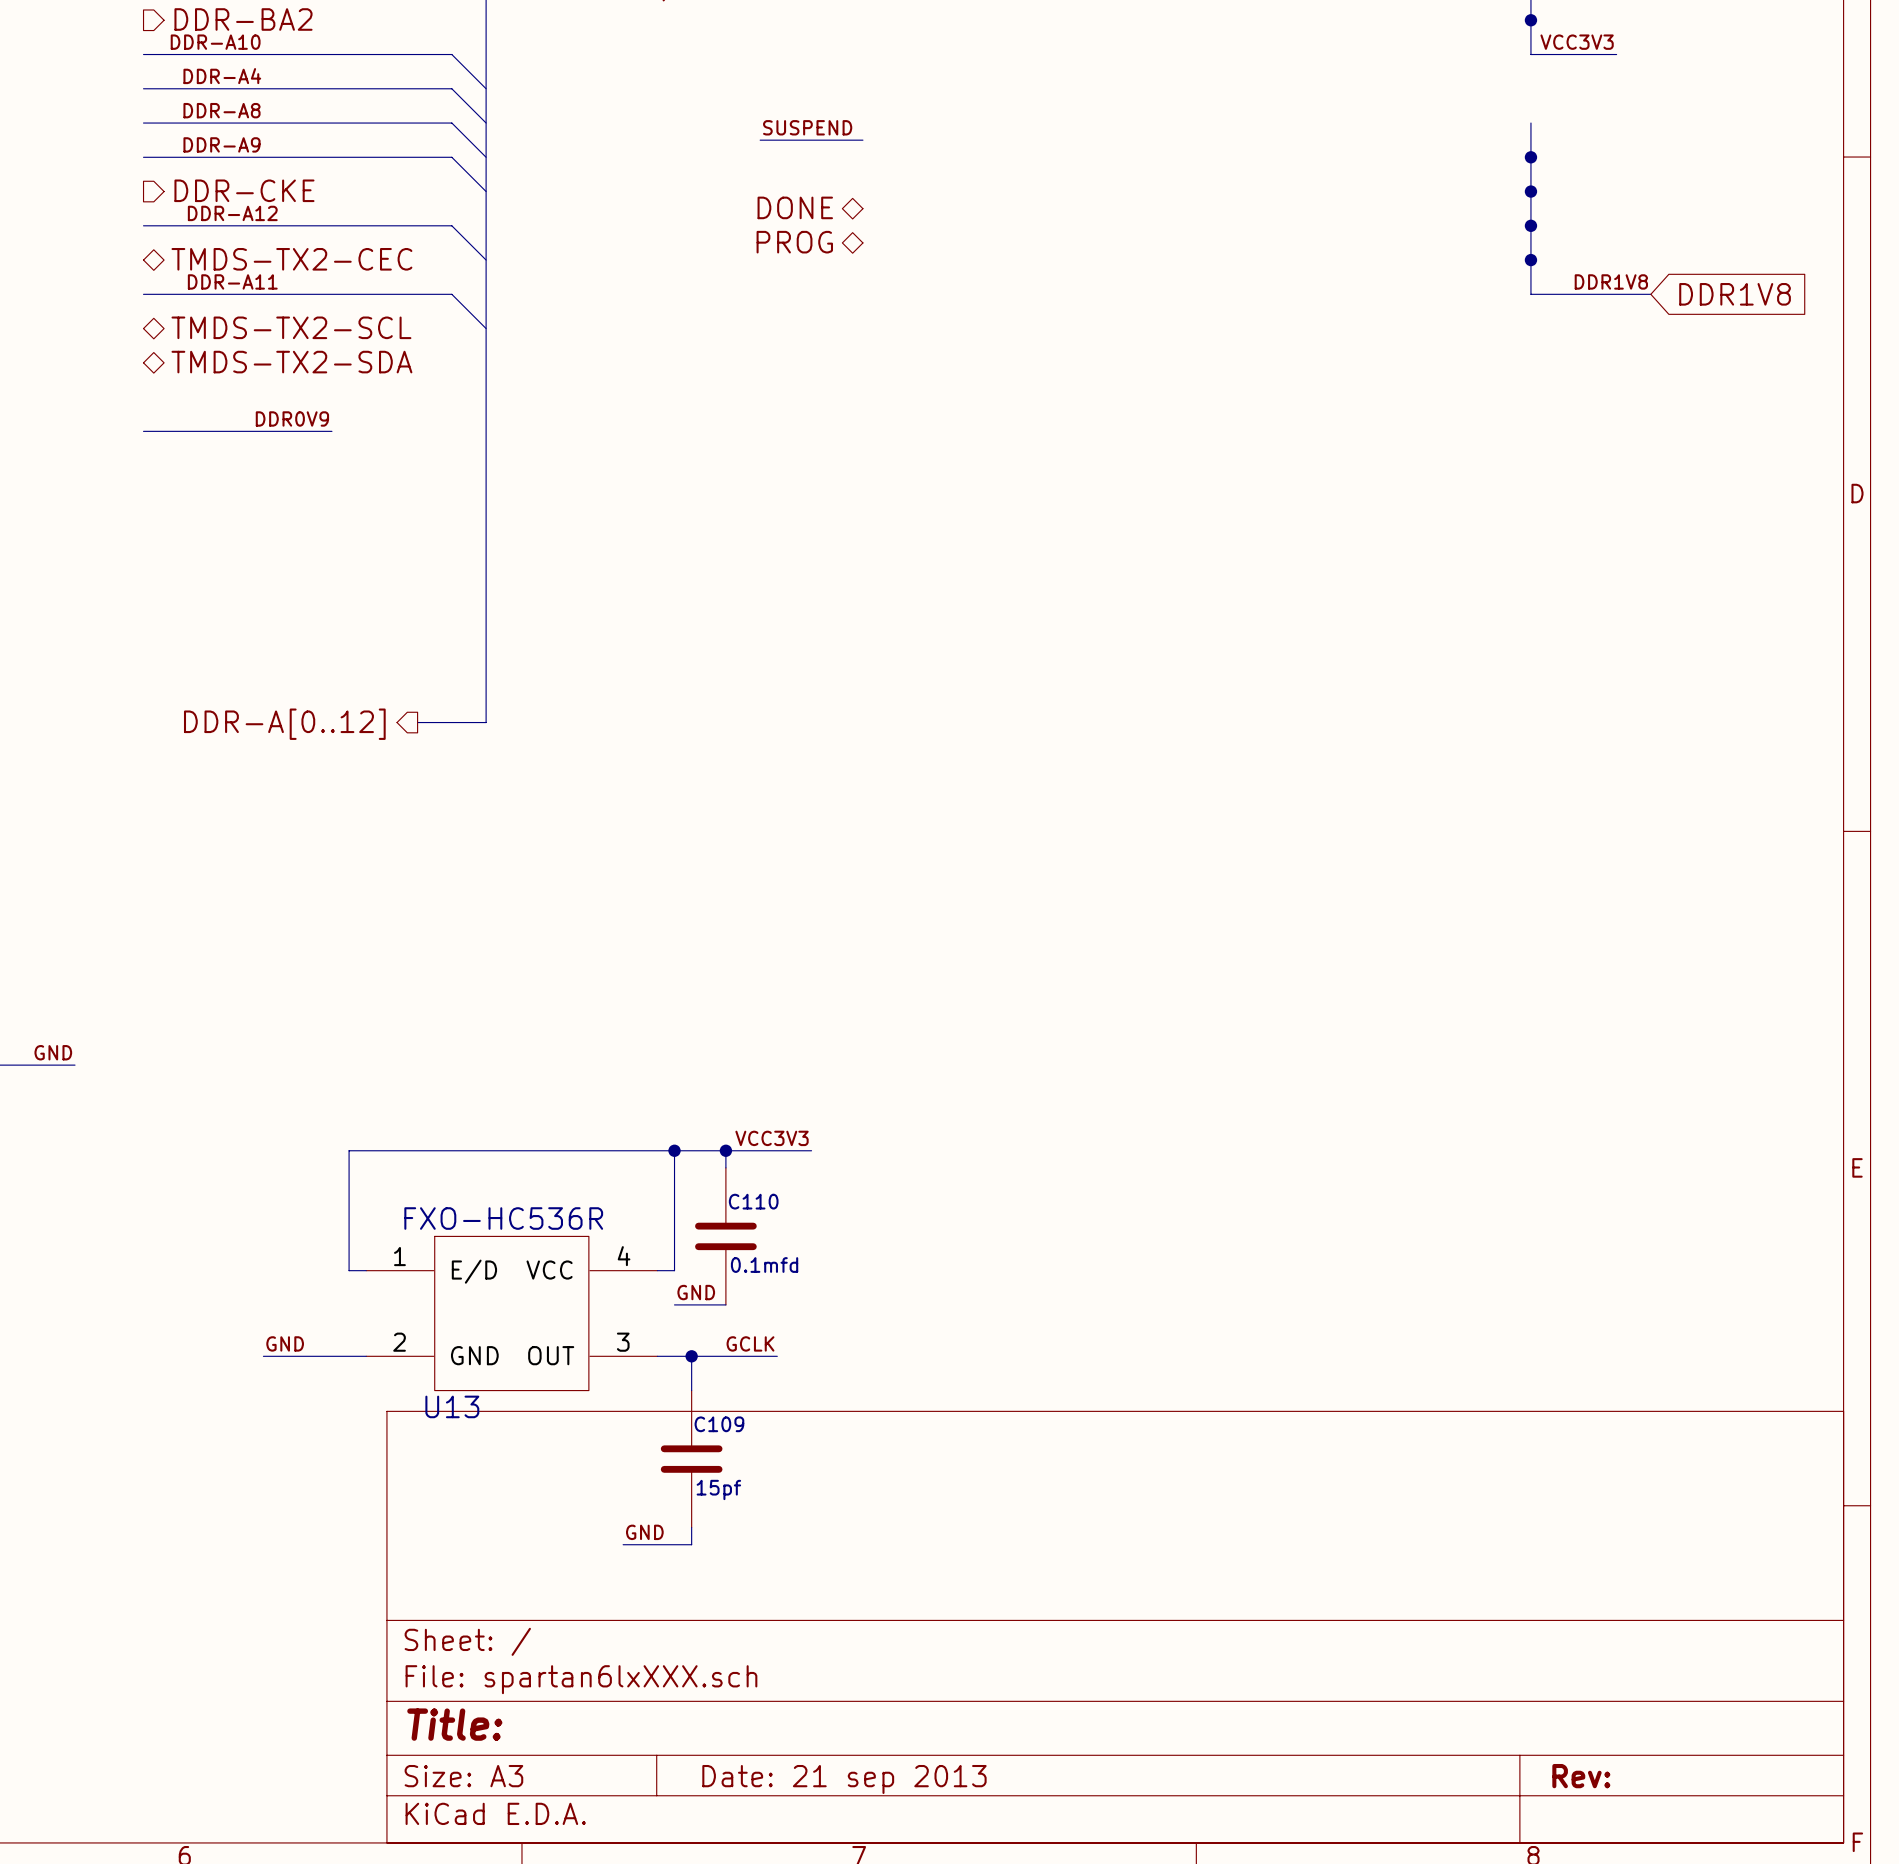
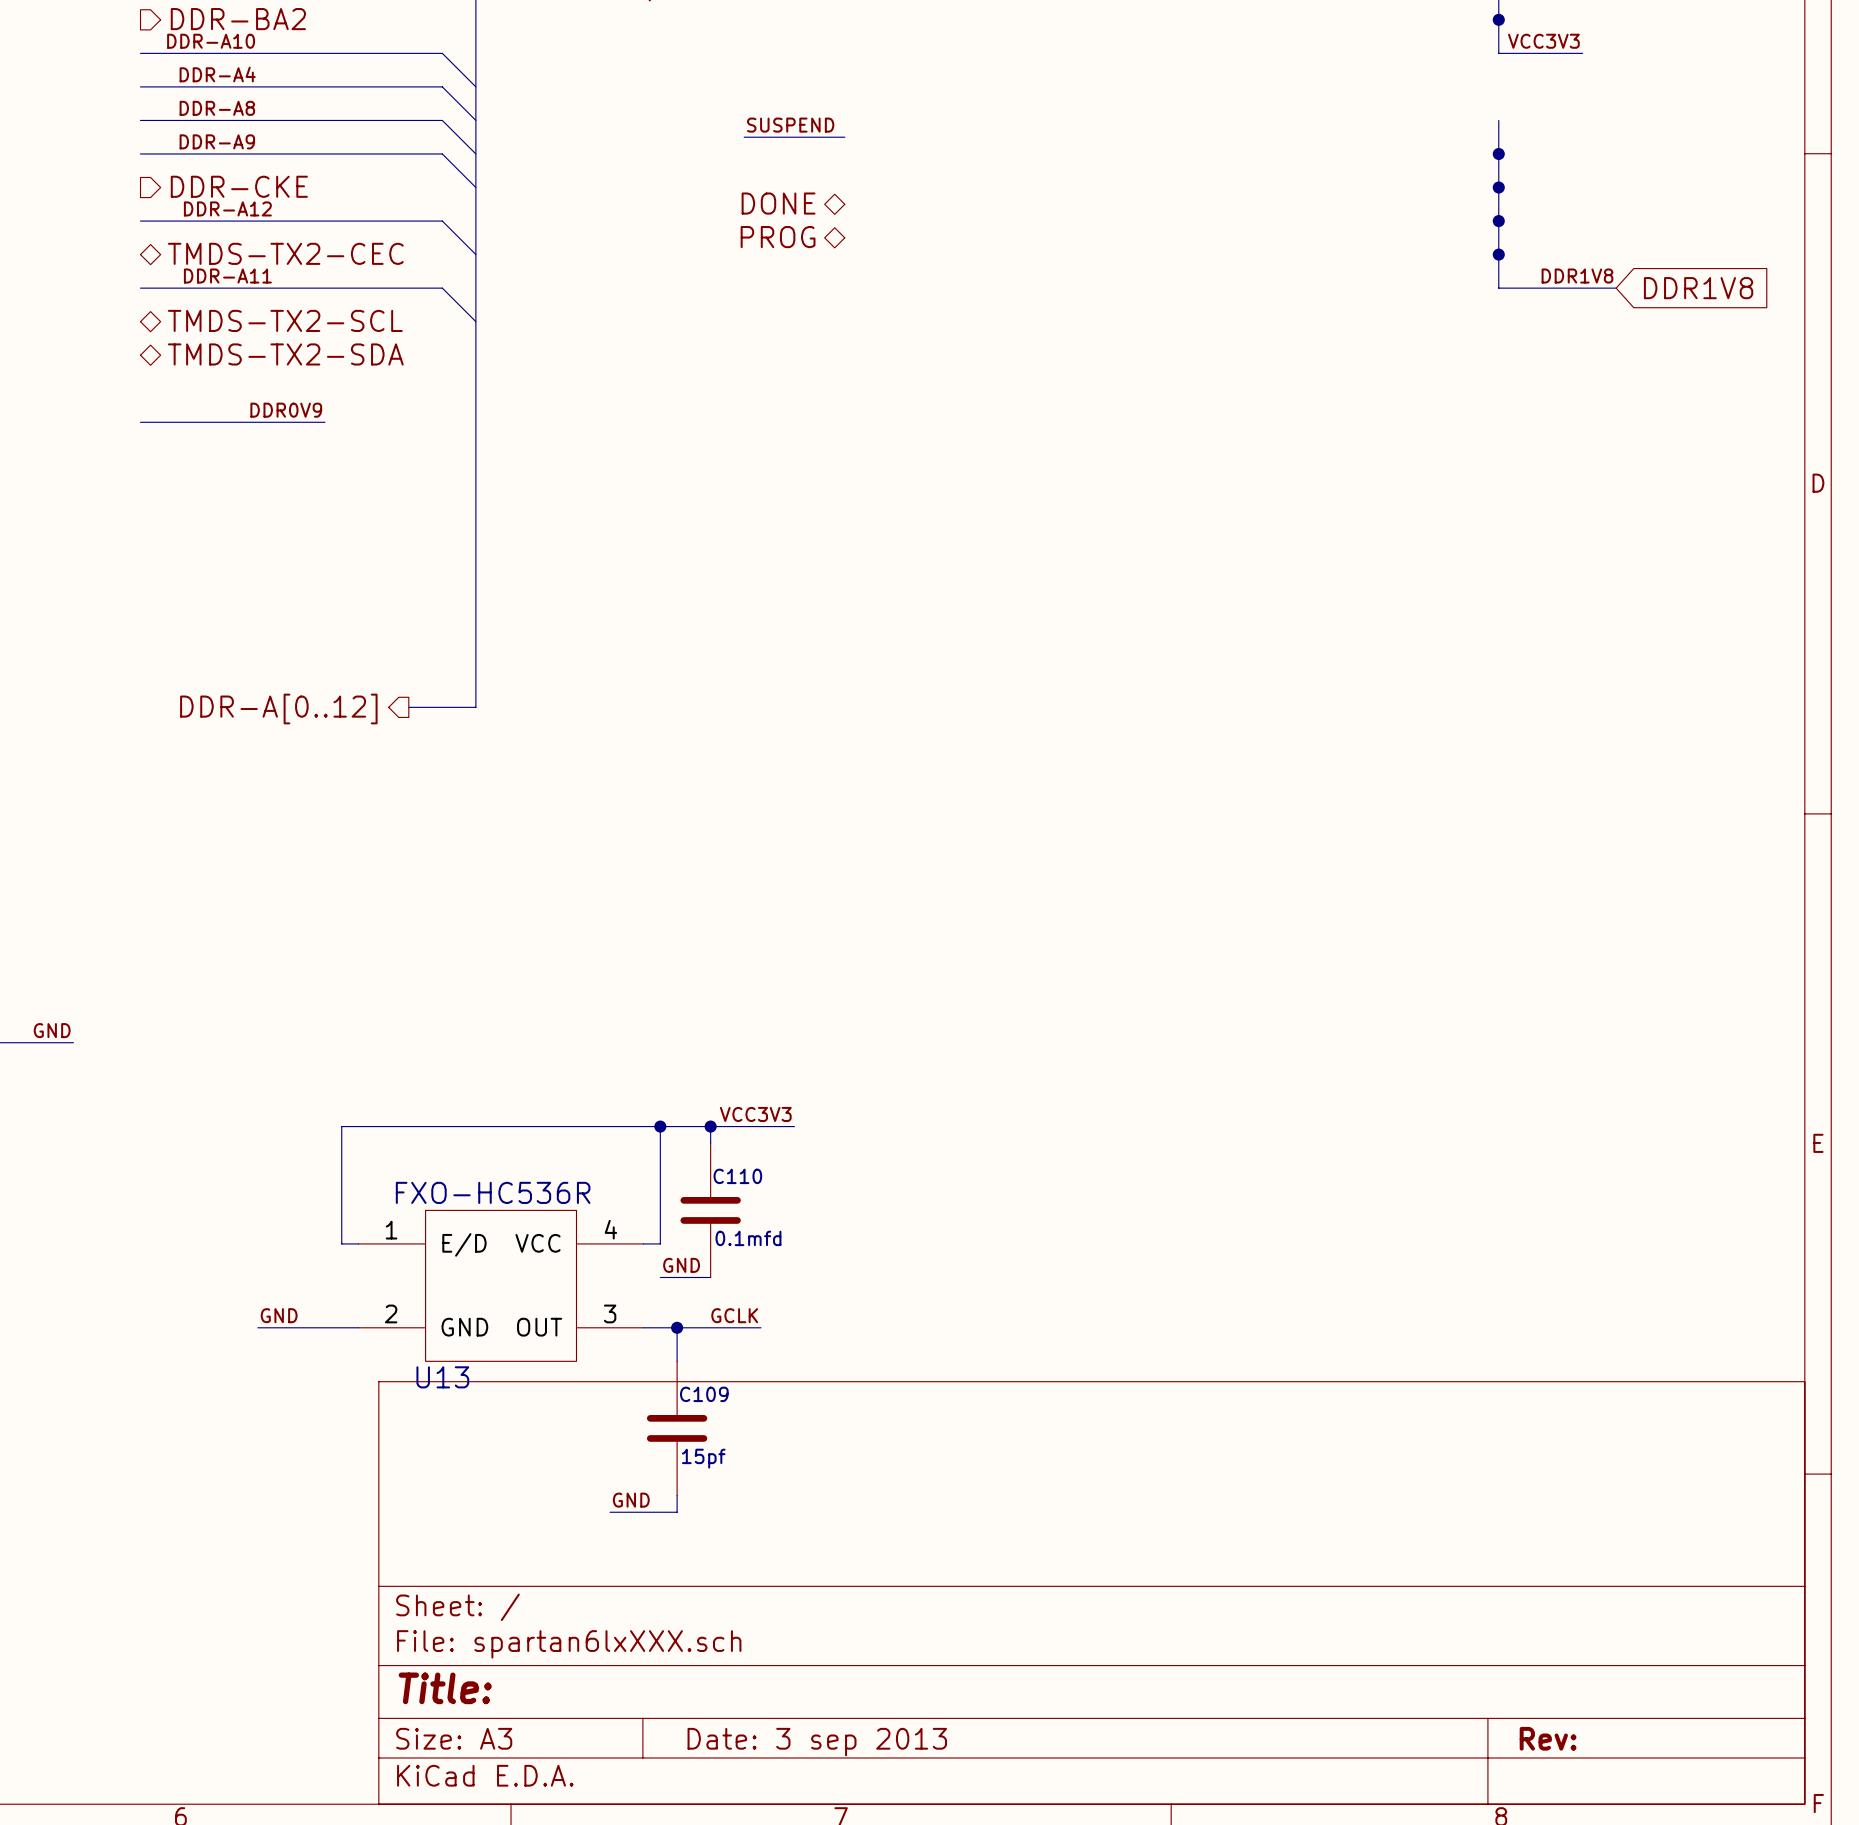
title block: Date: 21 sep 2013 (844, 1779) -> Date: 3 sep 2013 (817, 1742)

